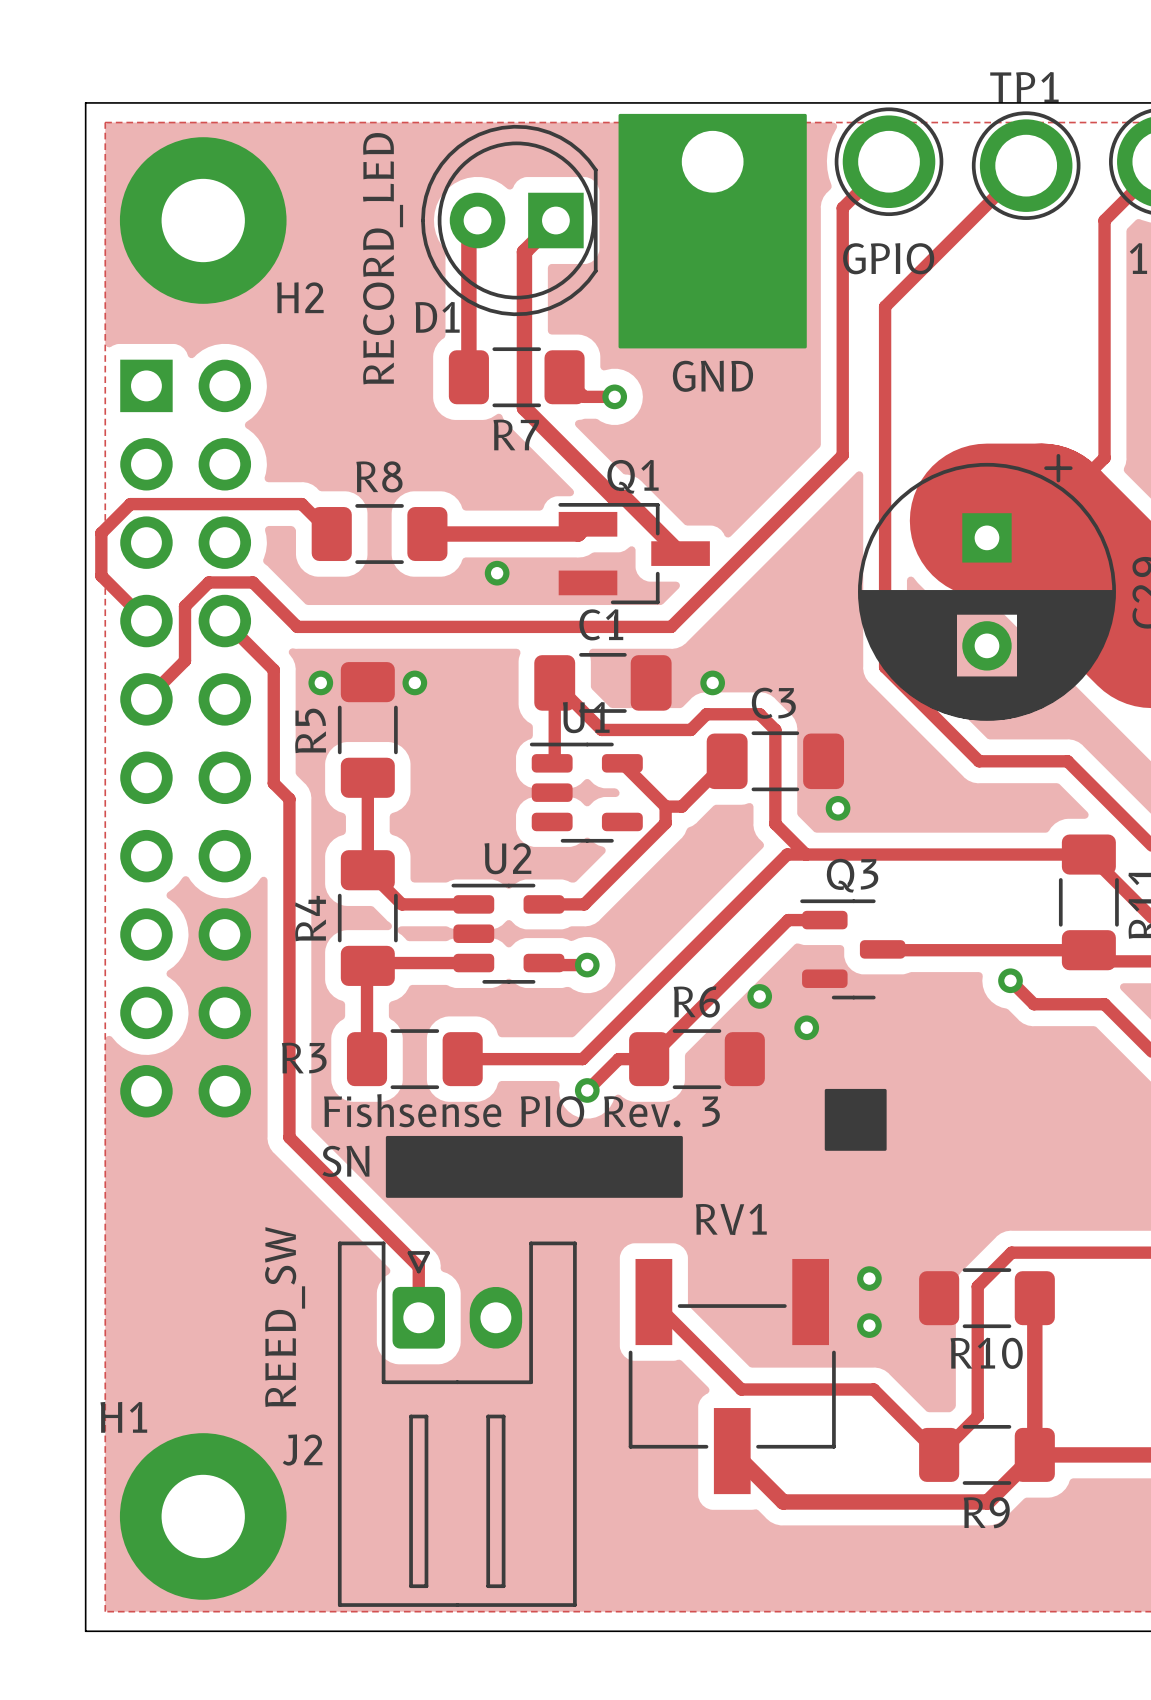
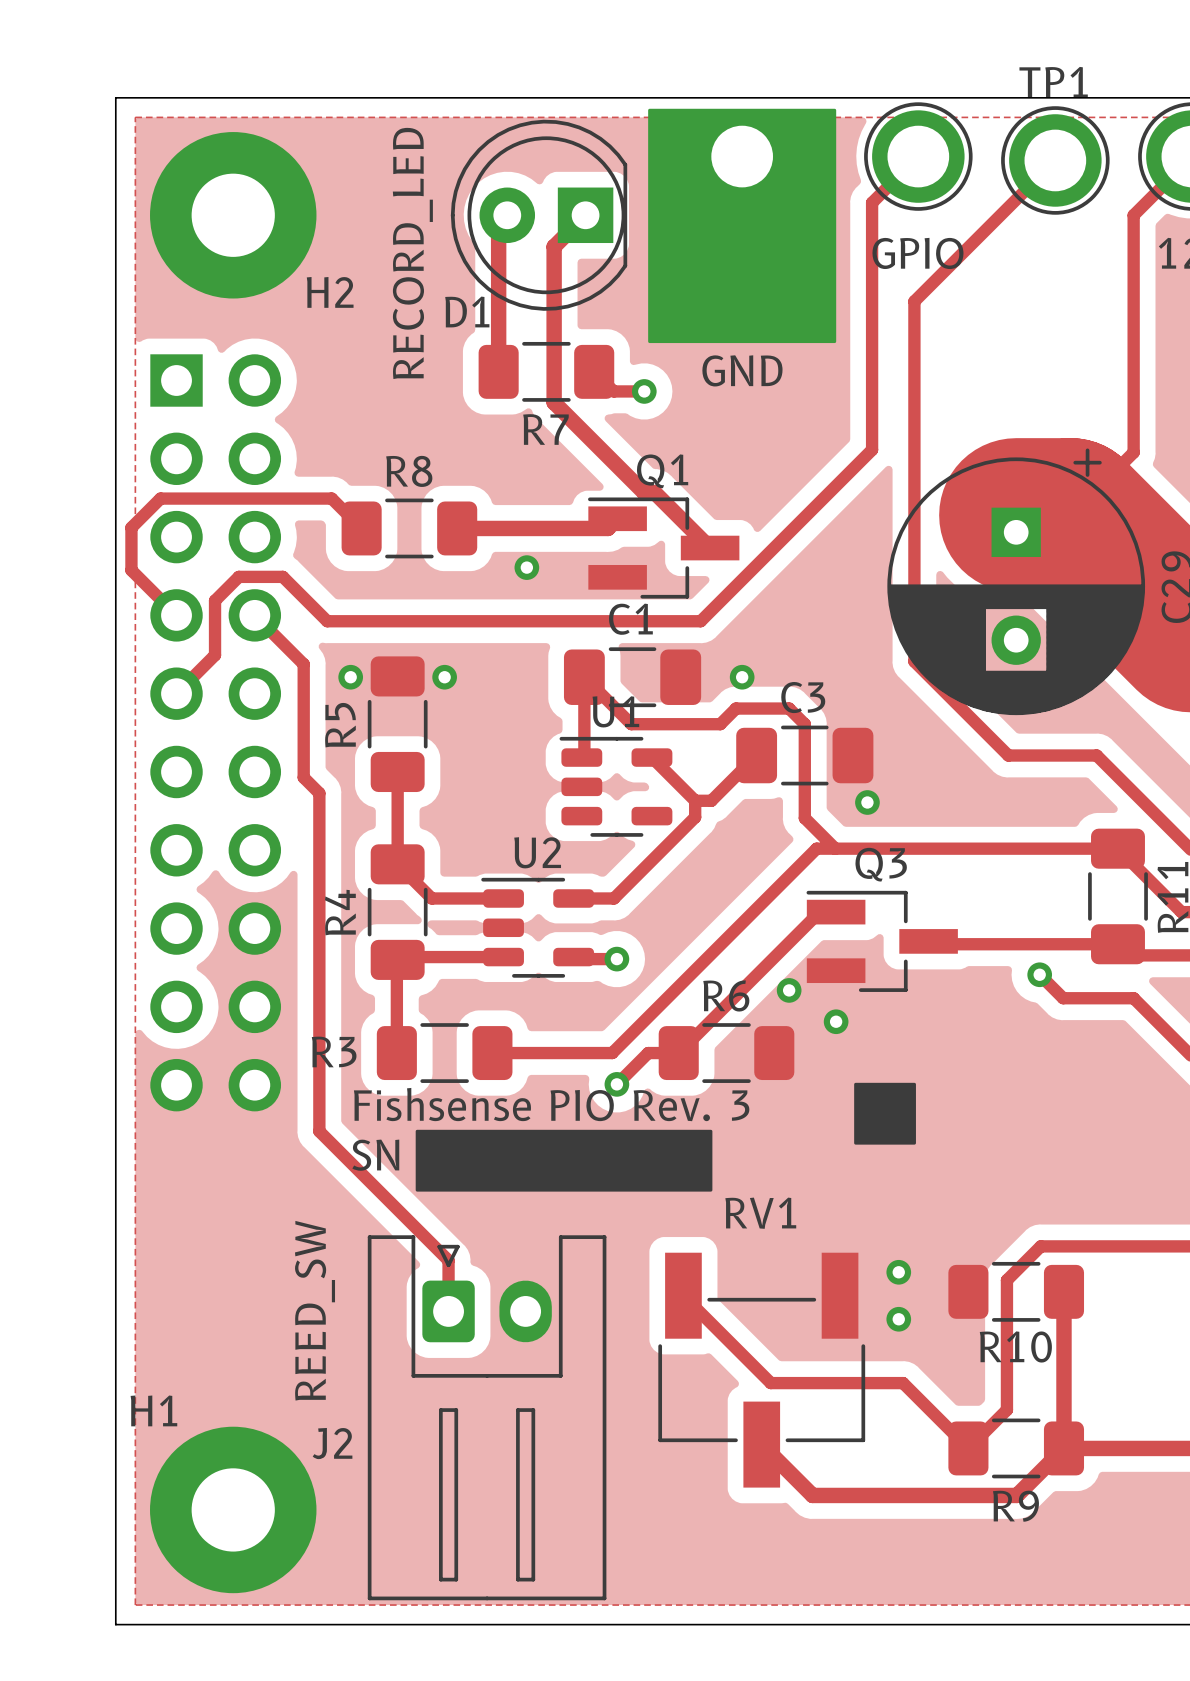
Q3 footprint: [800, 899, 906, 1000] -> [806, 890, 958, 992]

